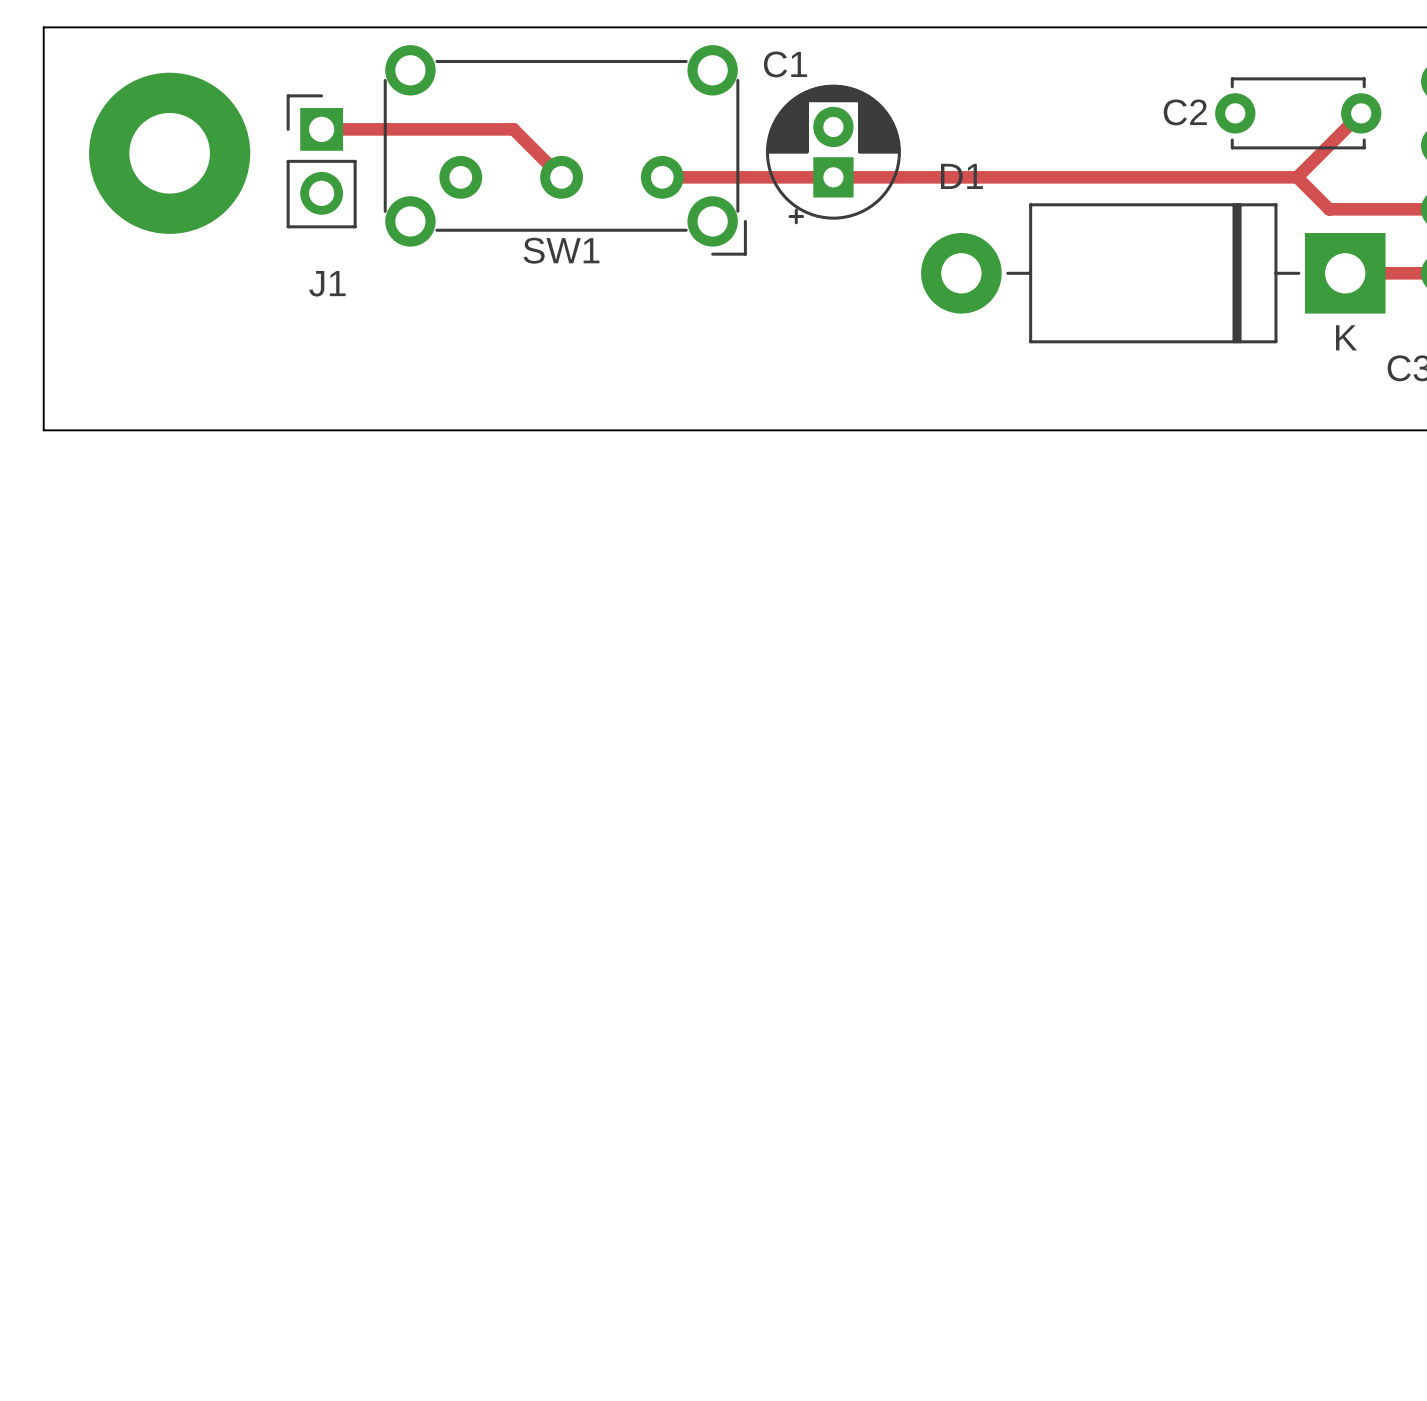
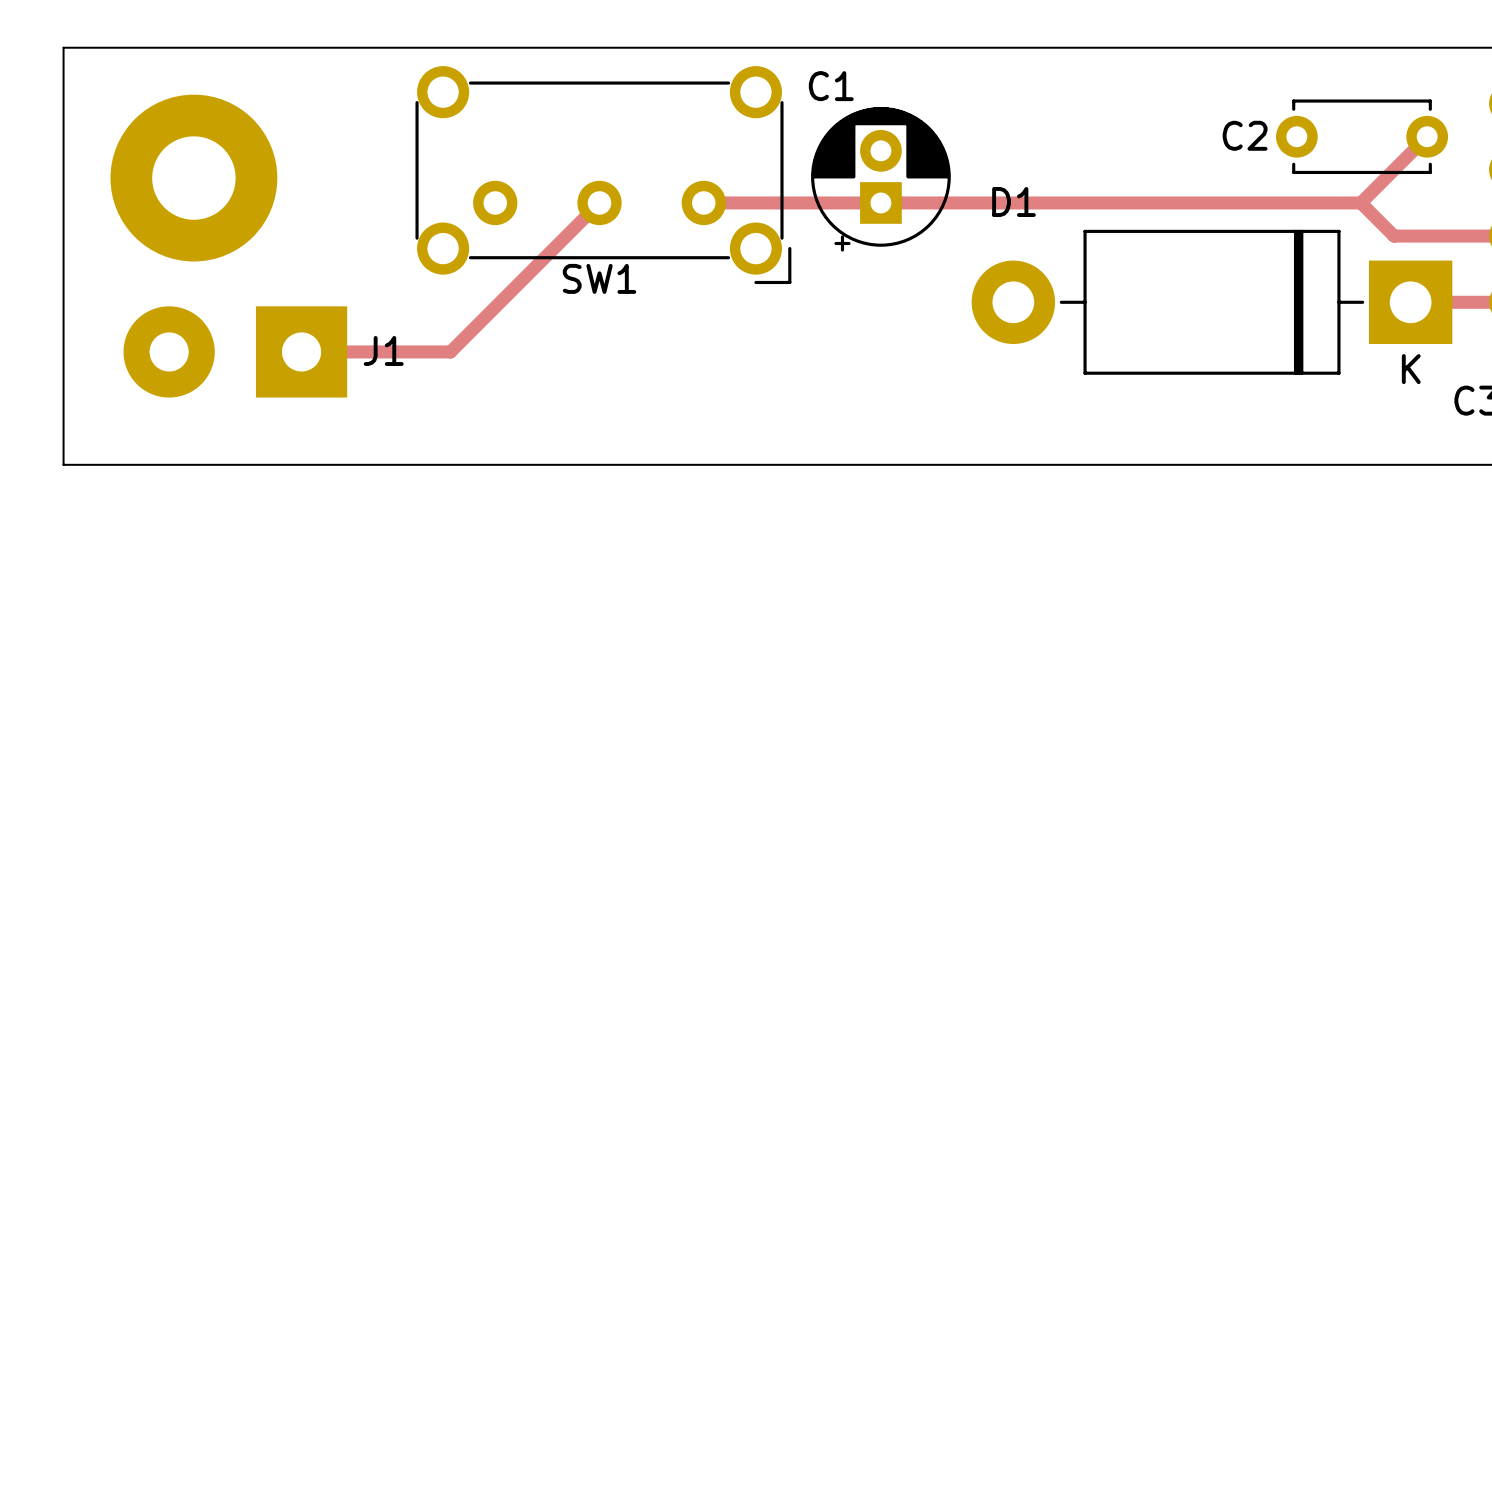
J1 footprint: [286, 94, 357, 229] -> [123, 306, 348, 398]
track: (321, 129) (513, 129) (561, 177) -> (301, 351) (450, 351) (599, 202)
J1 name position: J1 (327, 283) -> J1 (383, 350)

